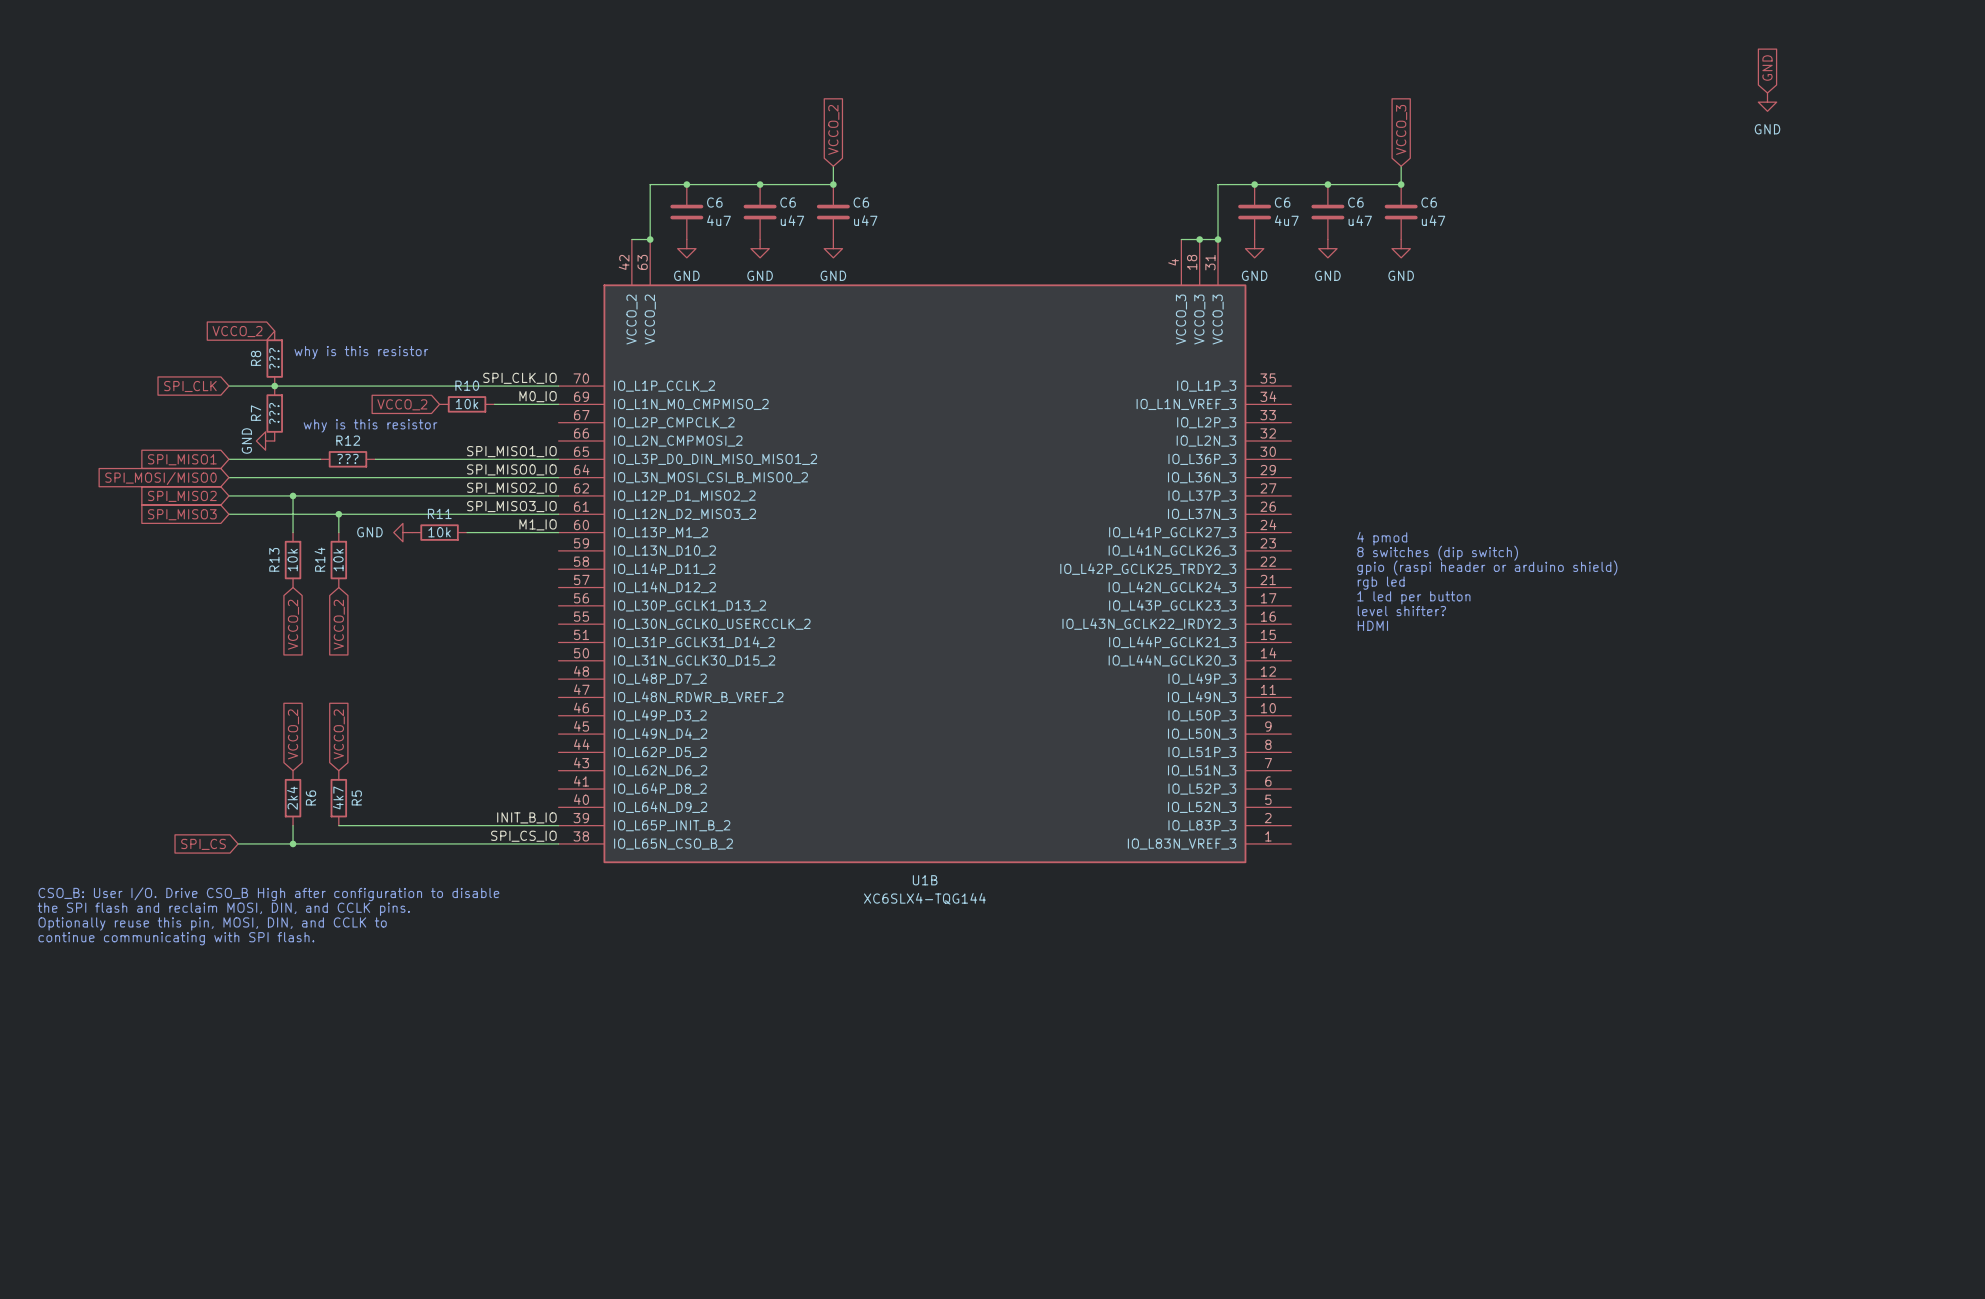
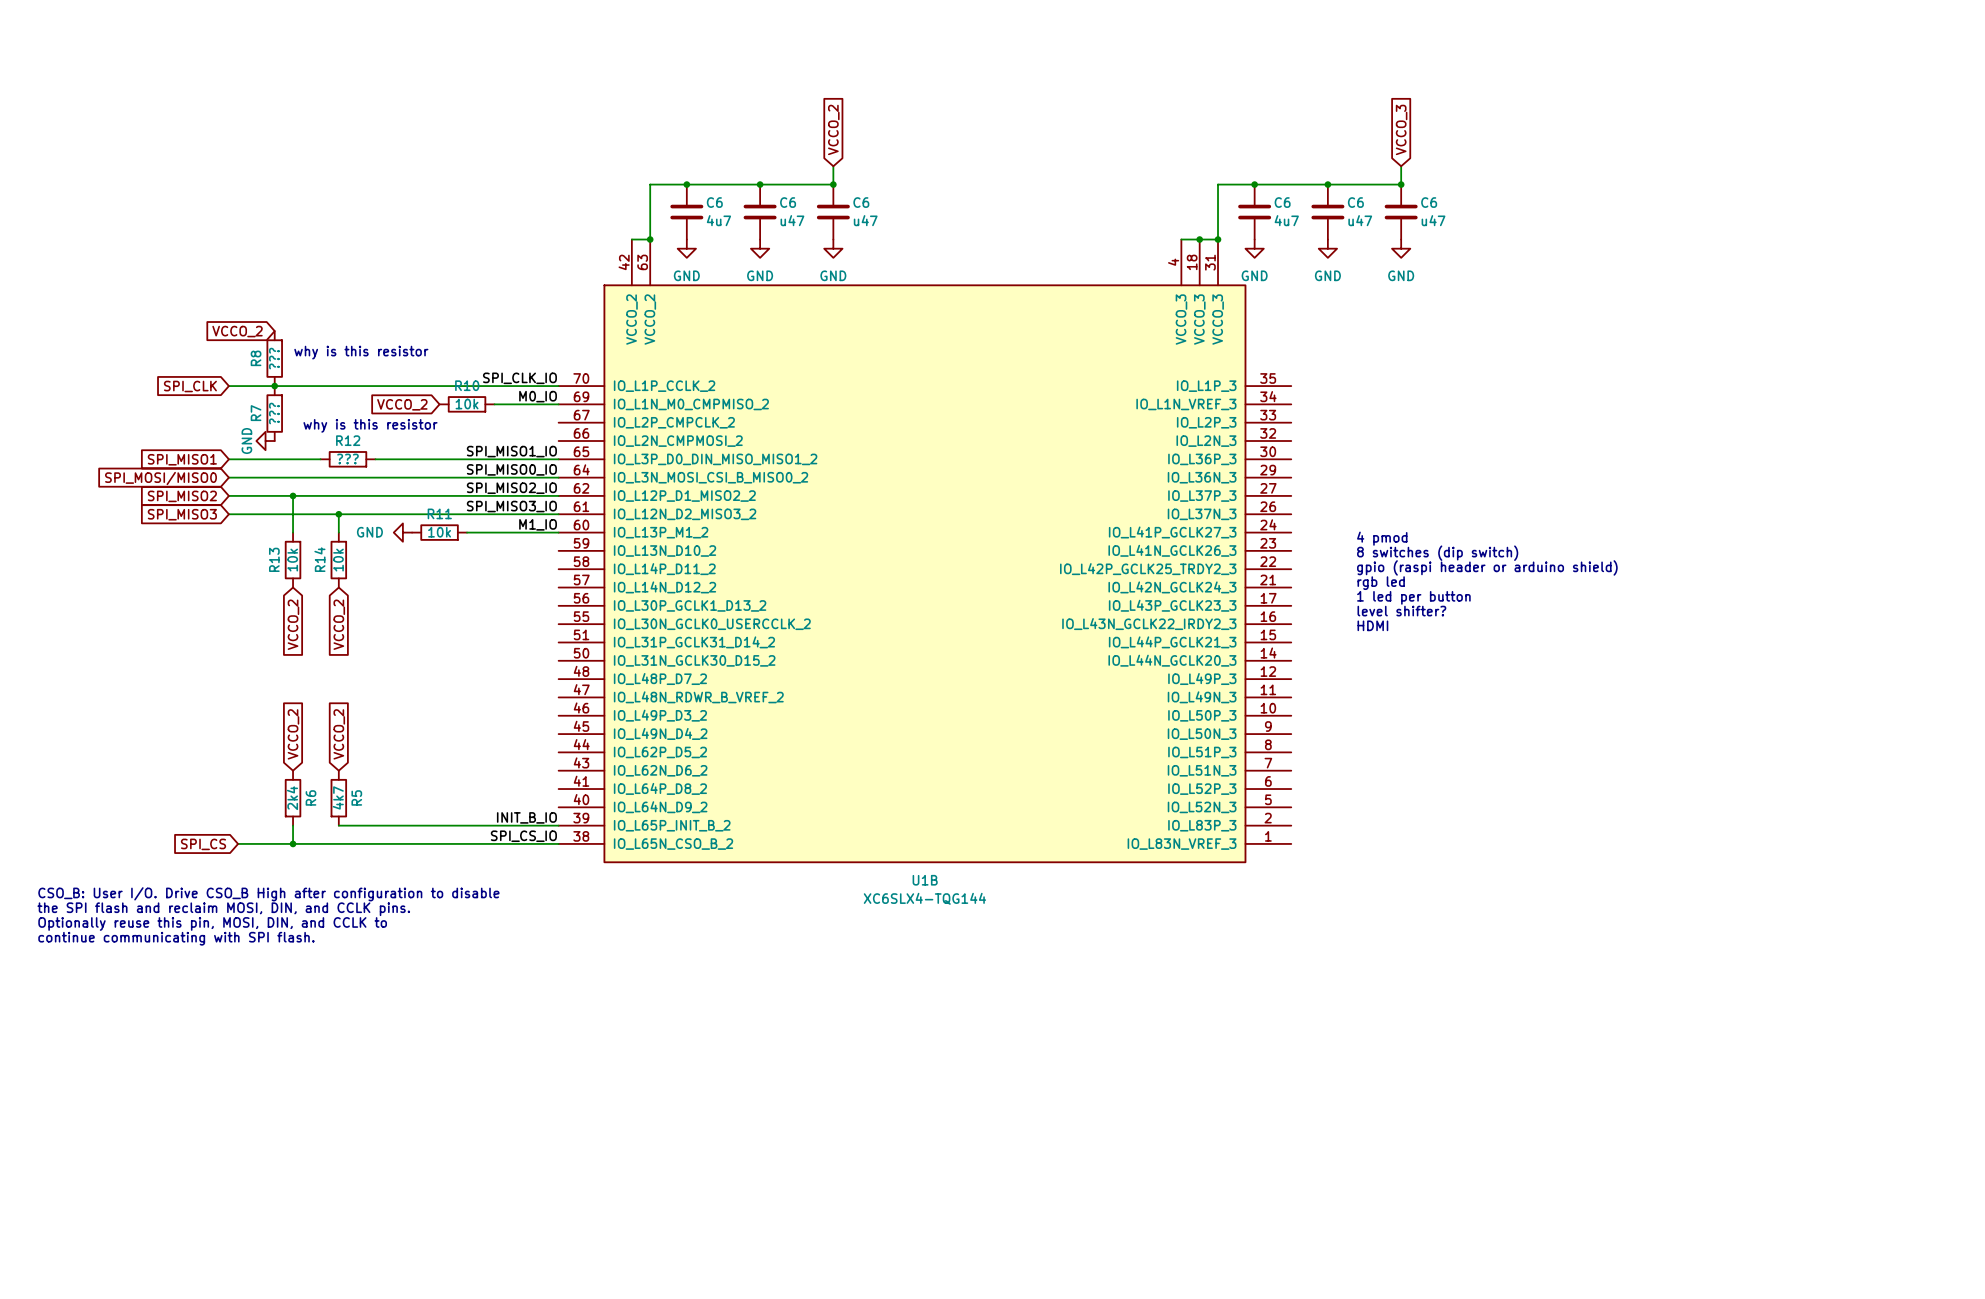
global label: GND (1767, 68) -> none
power symbol: GND (1767, 102) -> none

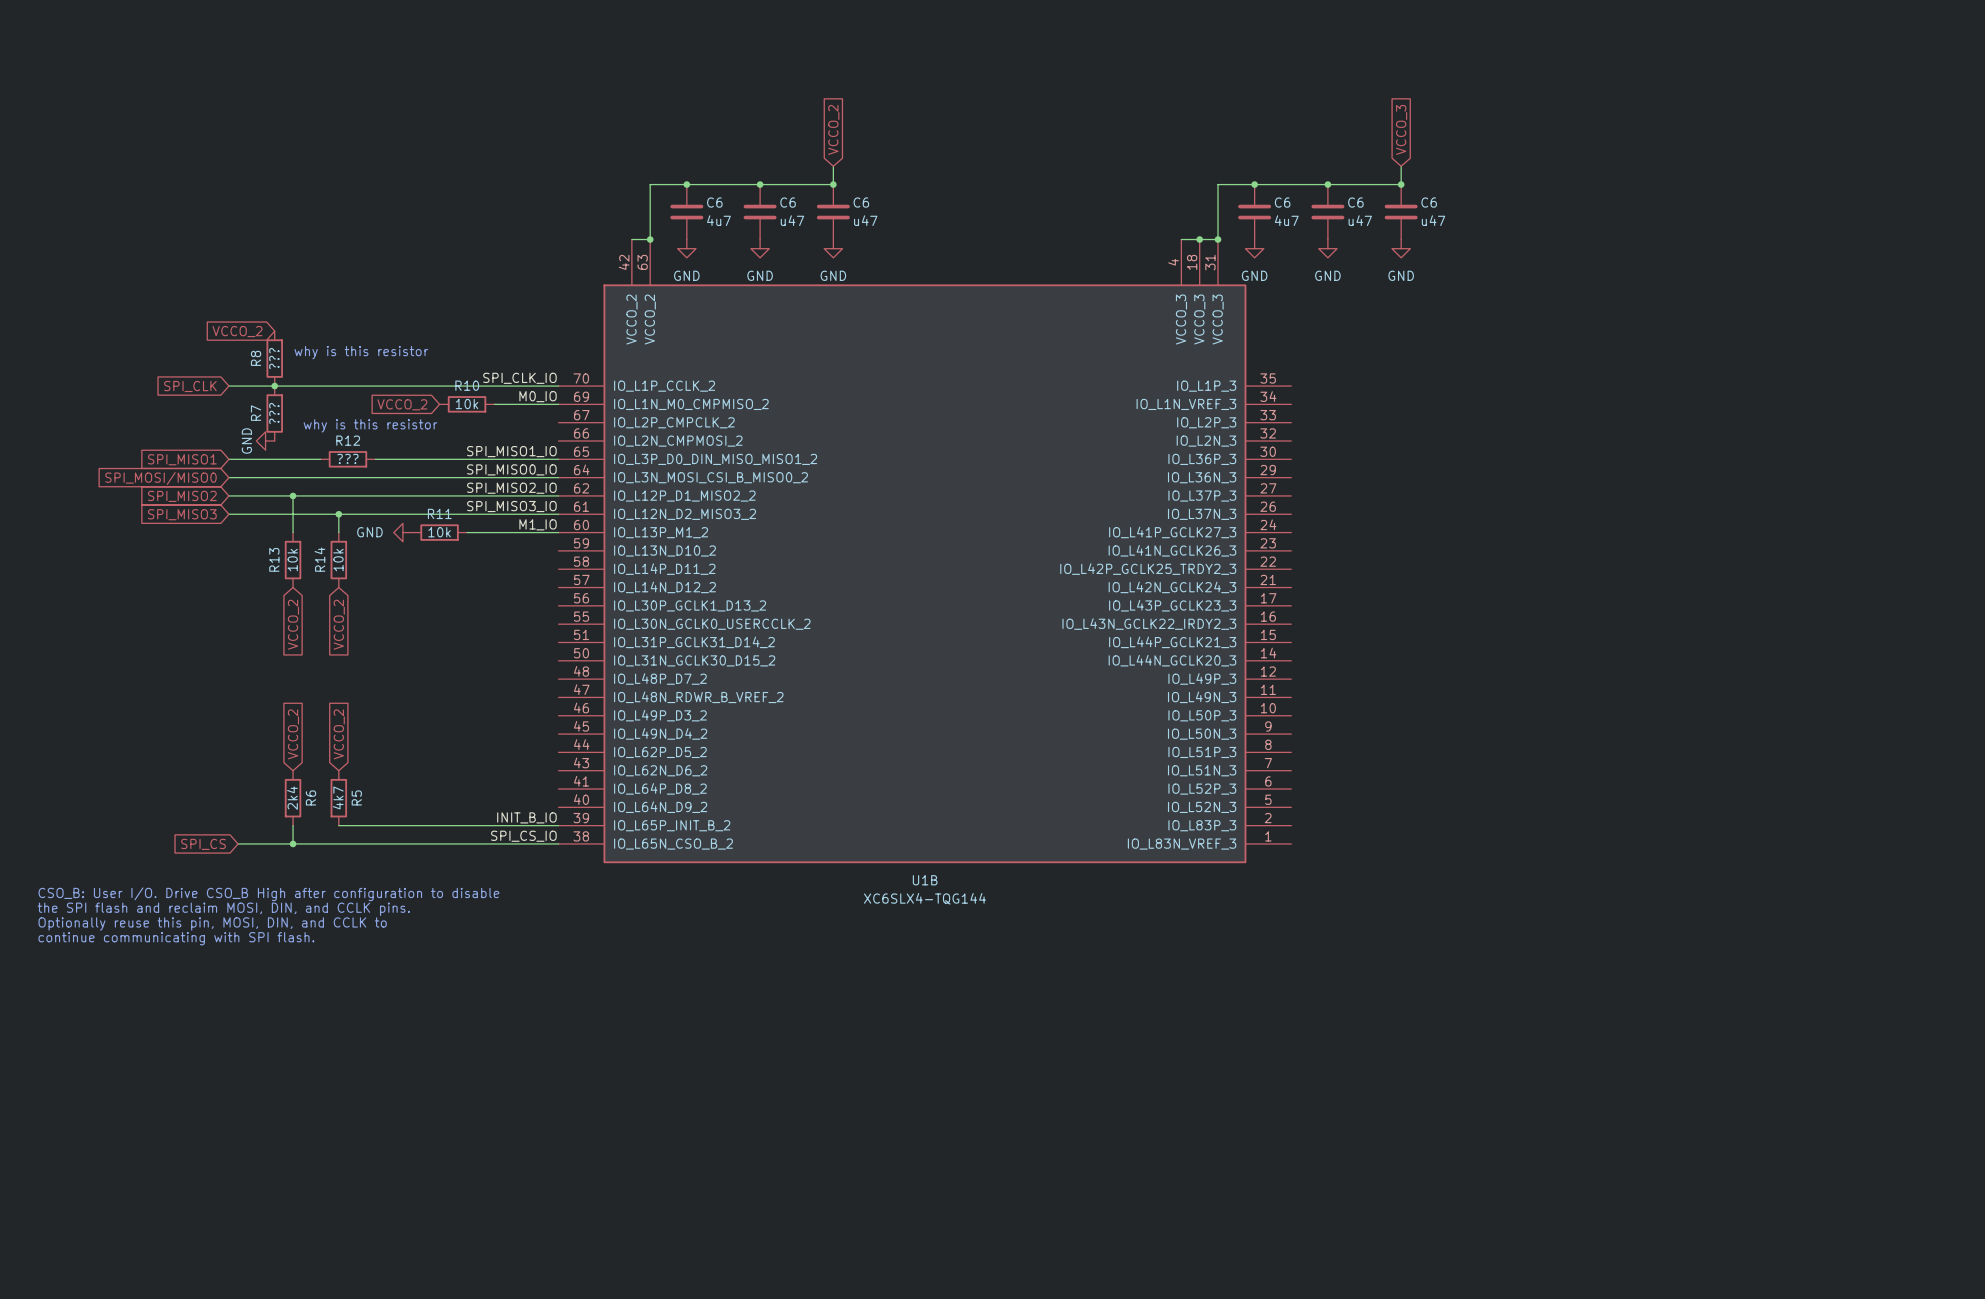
text: 4 pmod (1382, 538) -> none
text: 8 switches (dip switch) (1437, 553) -> none
text: gpio (raspi header or arduino shield) (1487, 567) -> none
text: rgb led (1381, 583) -> none
text: 1 led per button (1413, 597) -> none
text: level shifter? (1401, 611) -> none
text: HDMI (1372, 625) -> none

